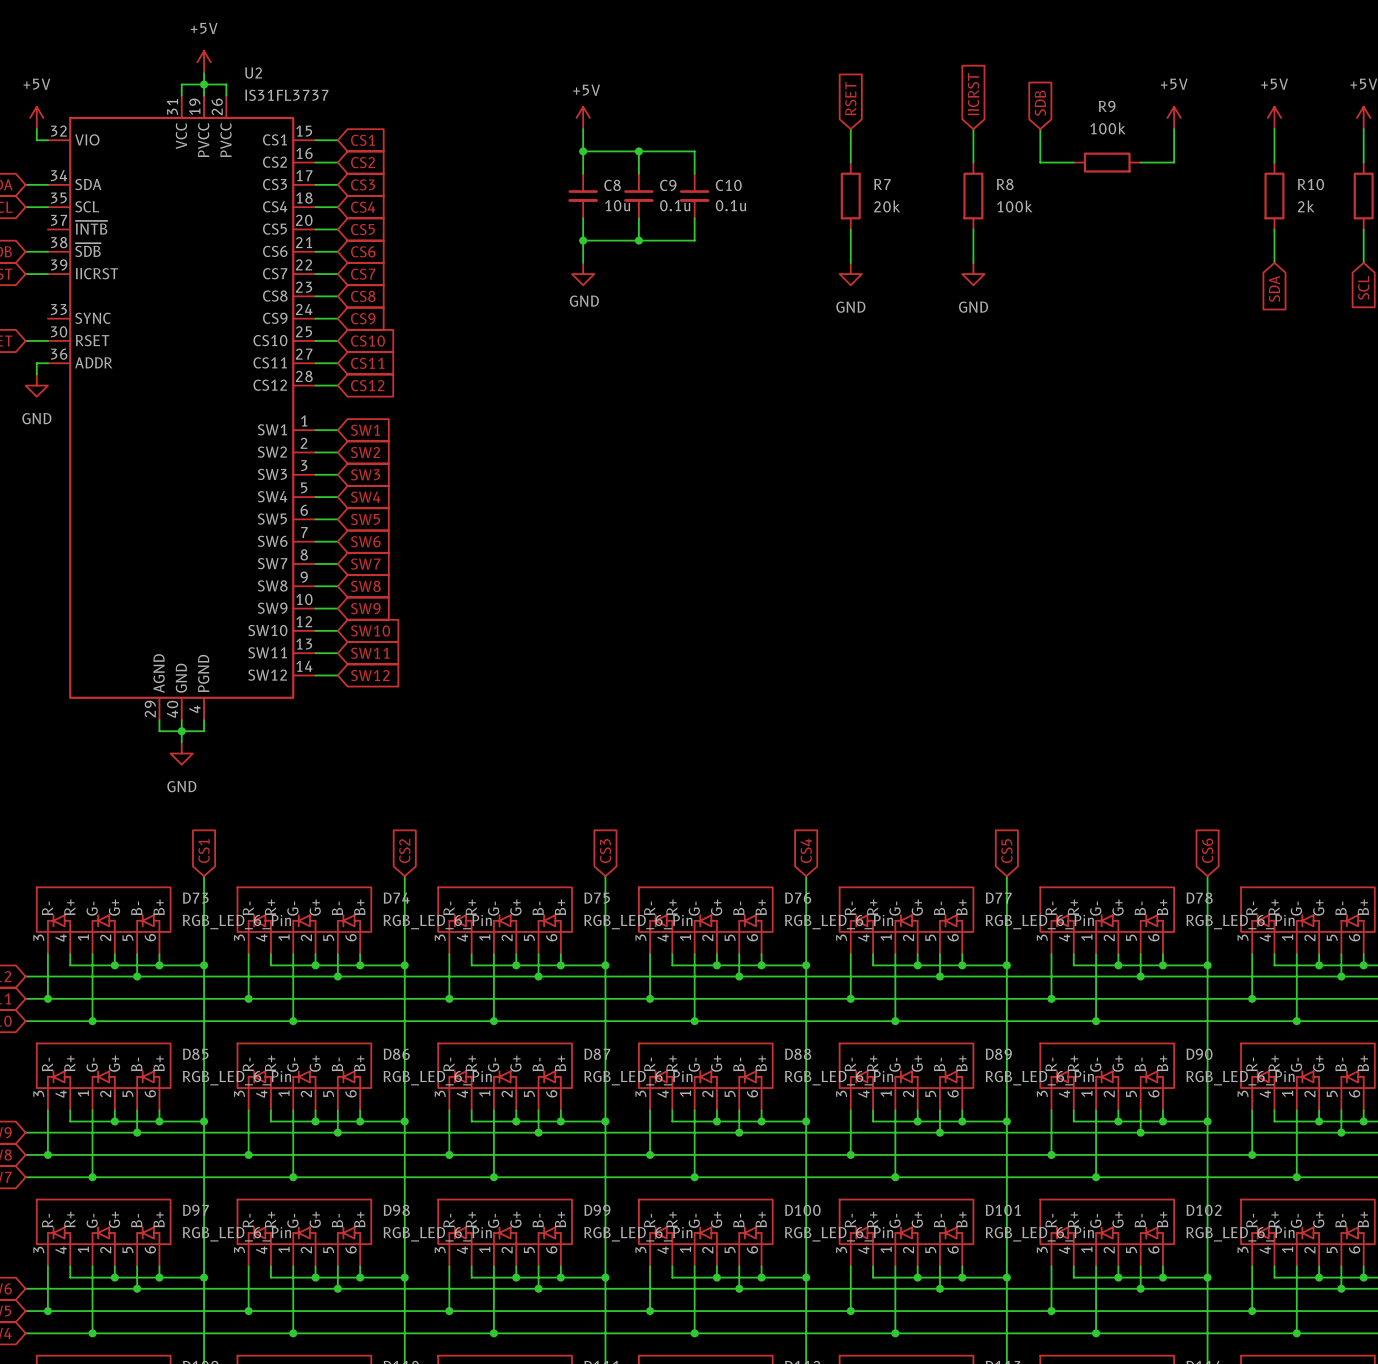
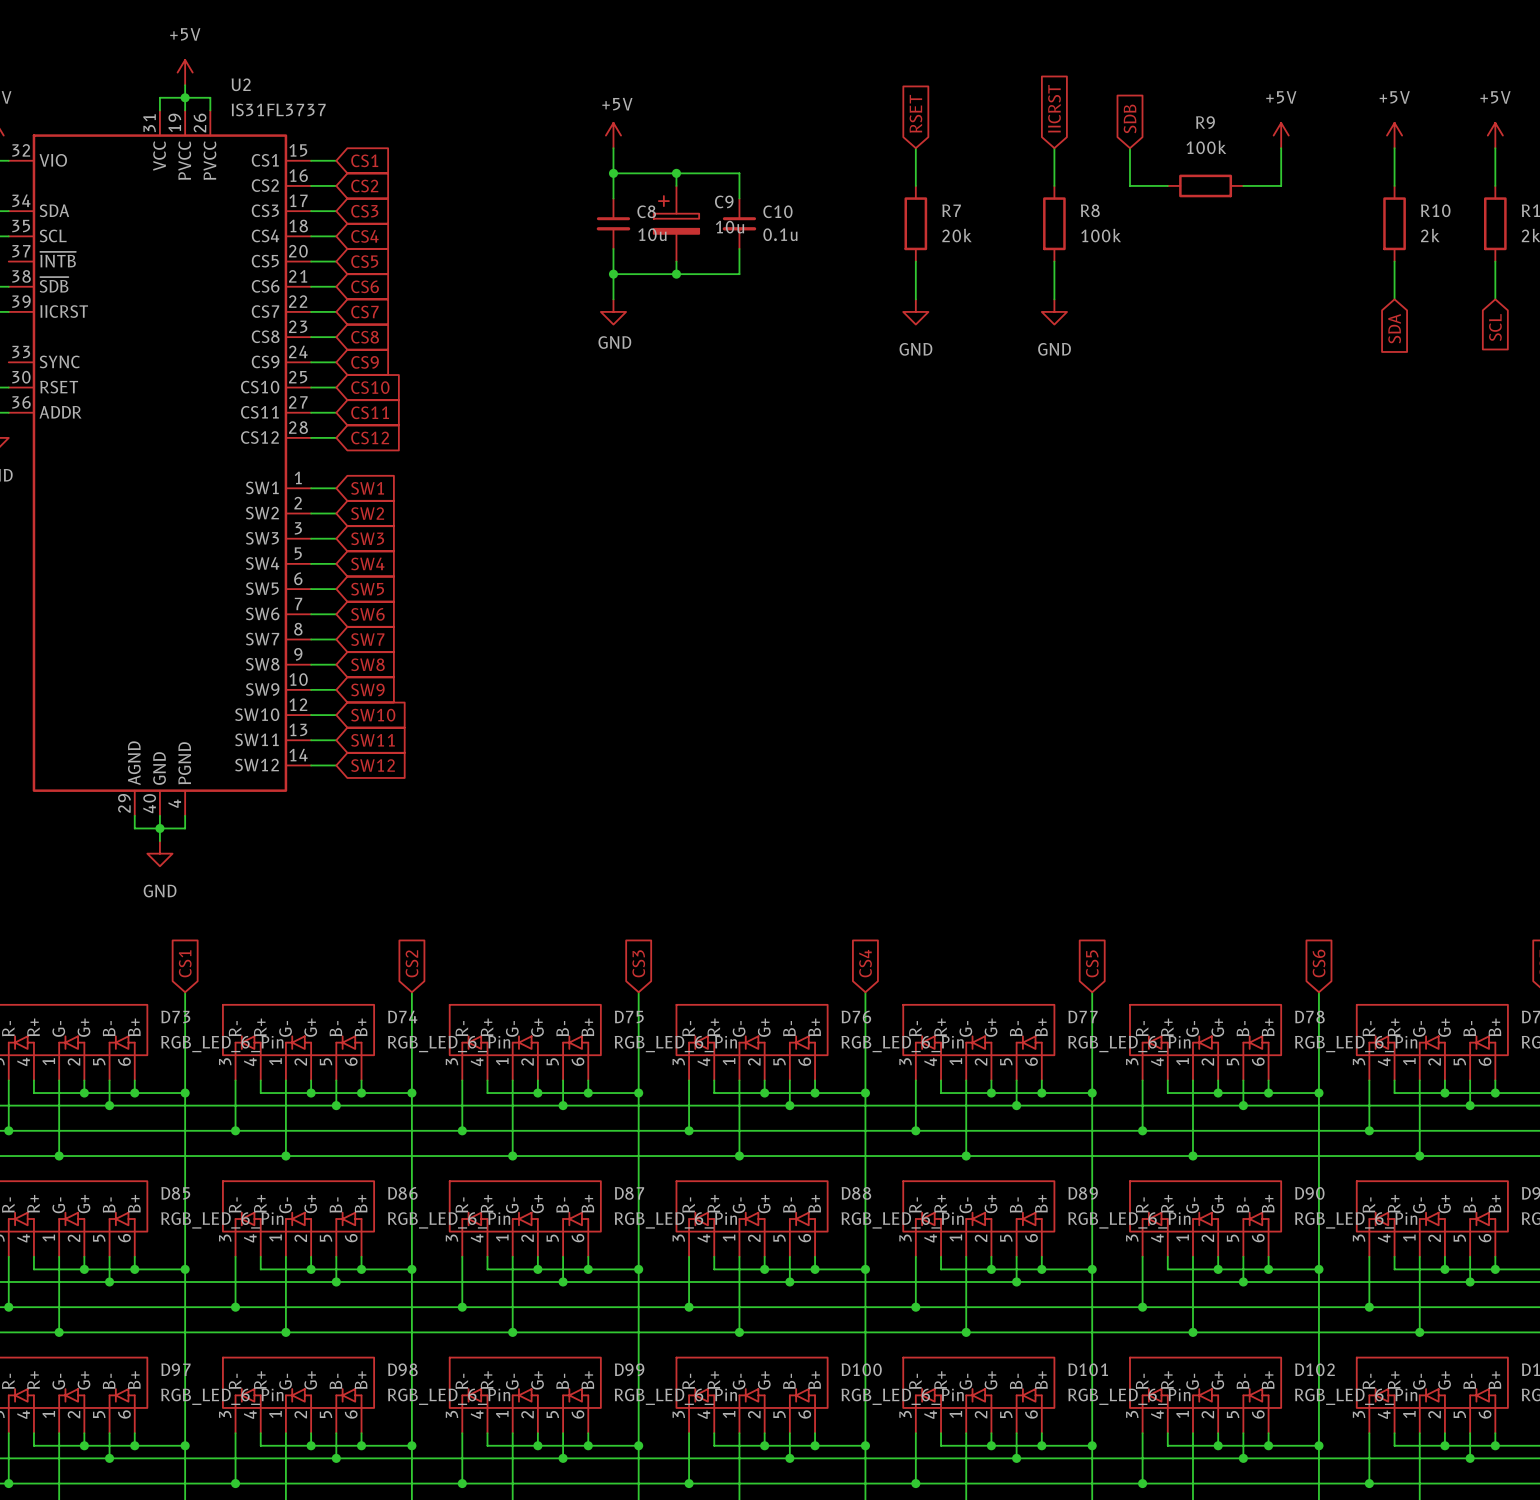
C9 symbol: [624, 173, 654, 219] -> [653, 185, 700, 262]
C9 value: 0.1u (675, 205) -> 10u (729, 227)

